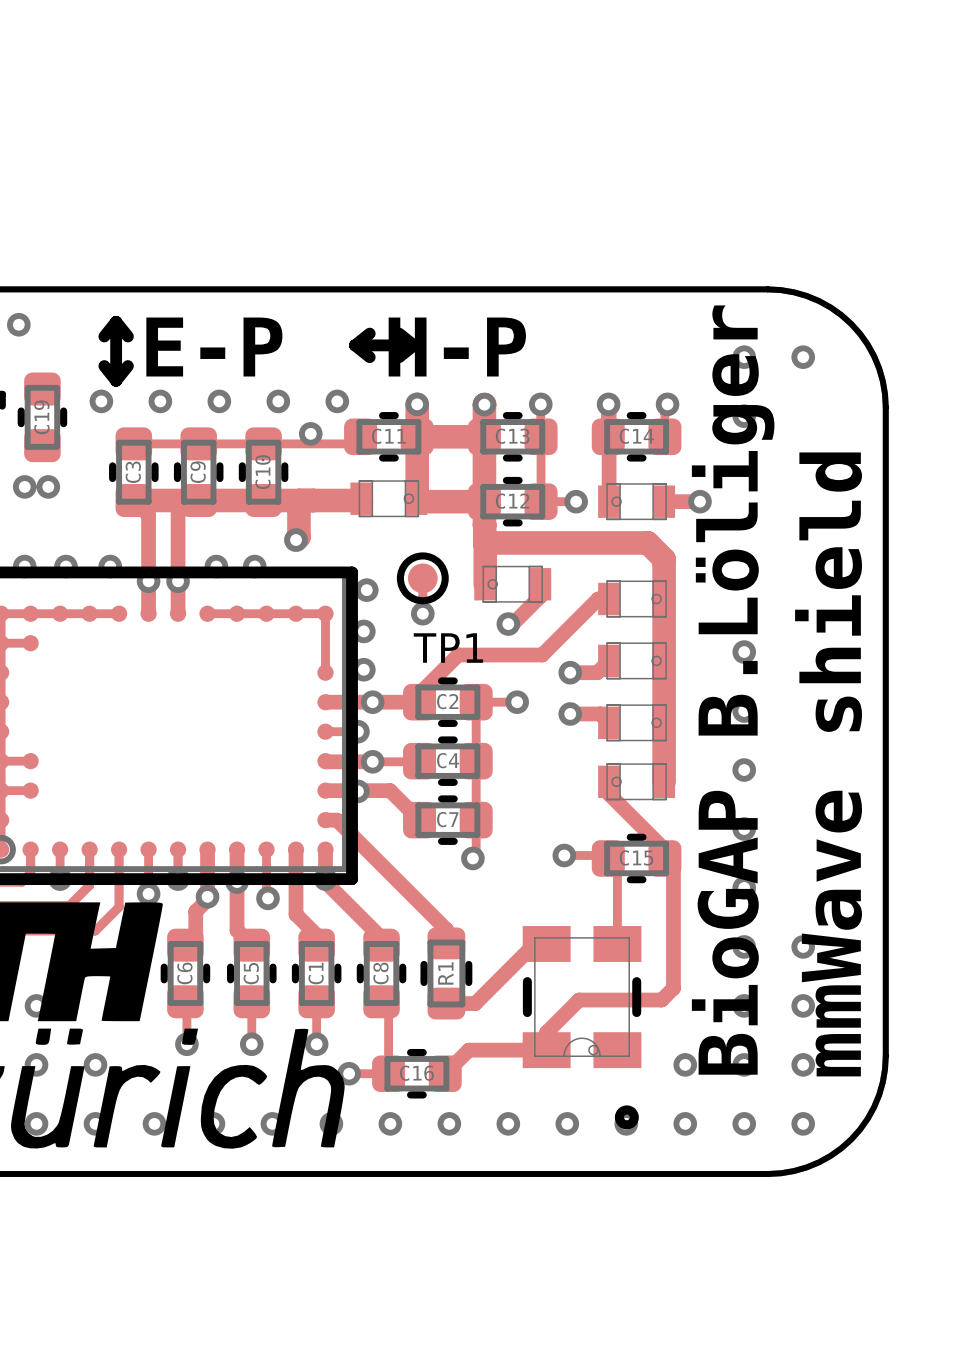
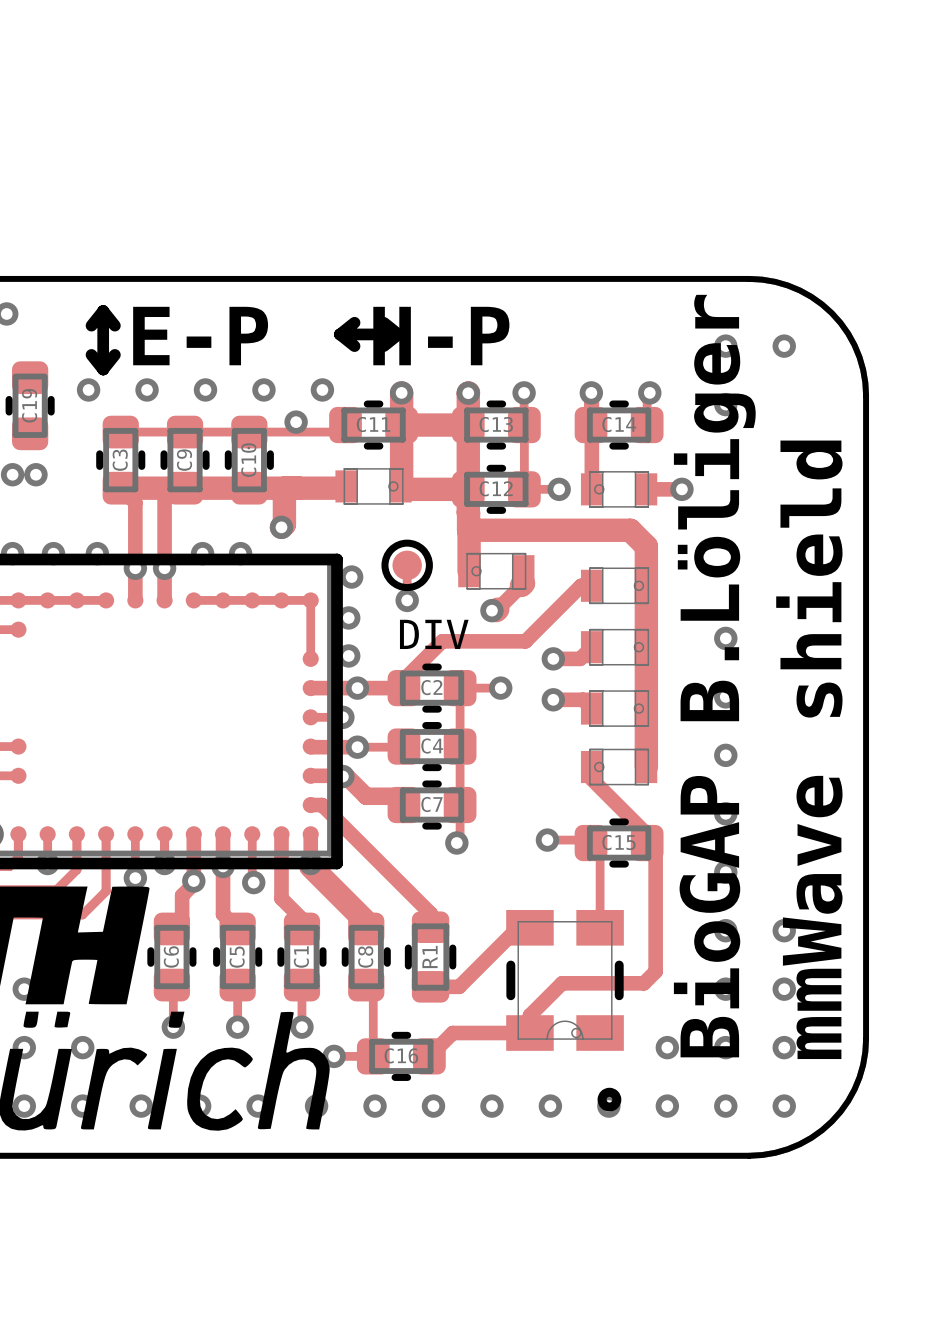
TP1 name: TP1 (448, 648) -> DIV (434, 634)
track: (360, 790) (390, 790) (410, 811) -> (343, 775) (366, 796) (395, 796)
track width: thin (325, 882) (381, 938) -> thick (310, 866) (366, 921)

